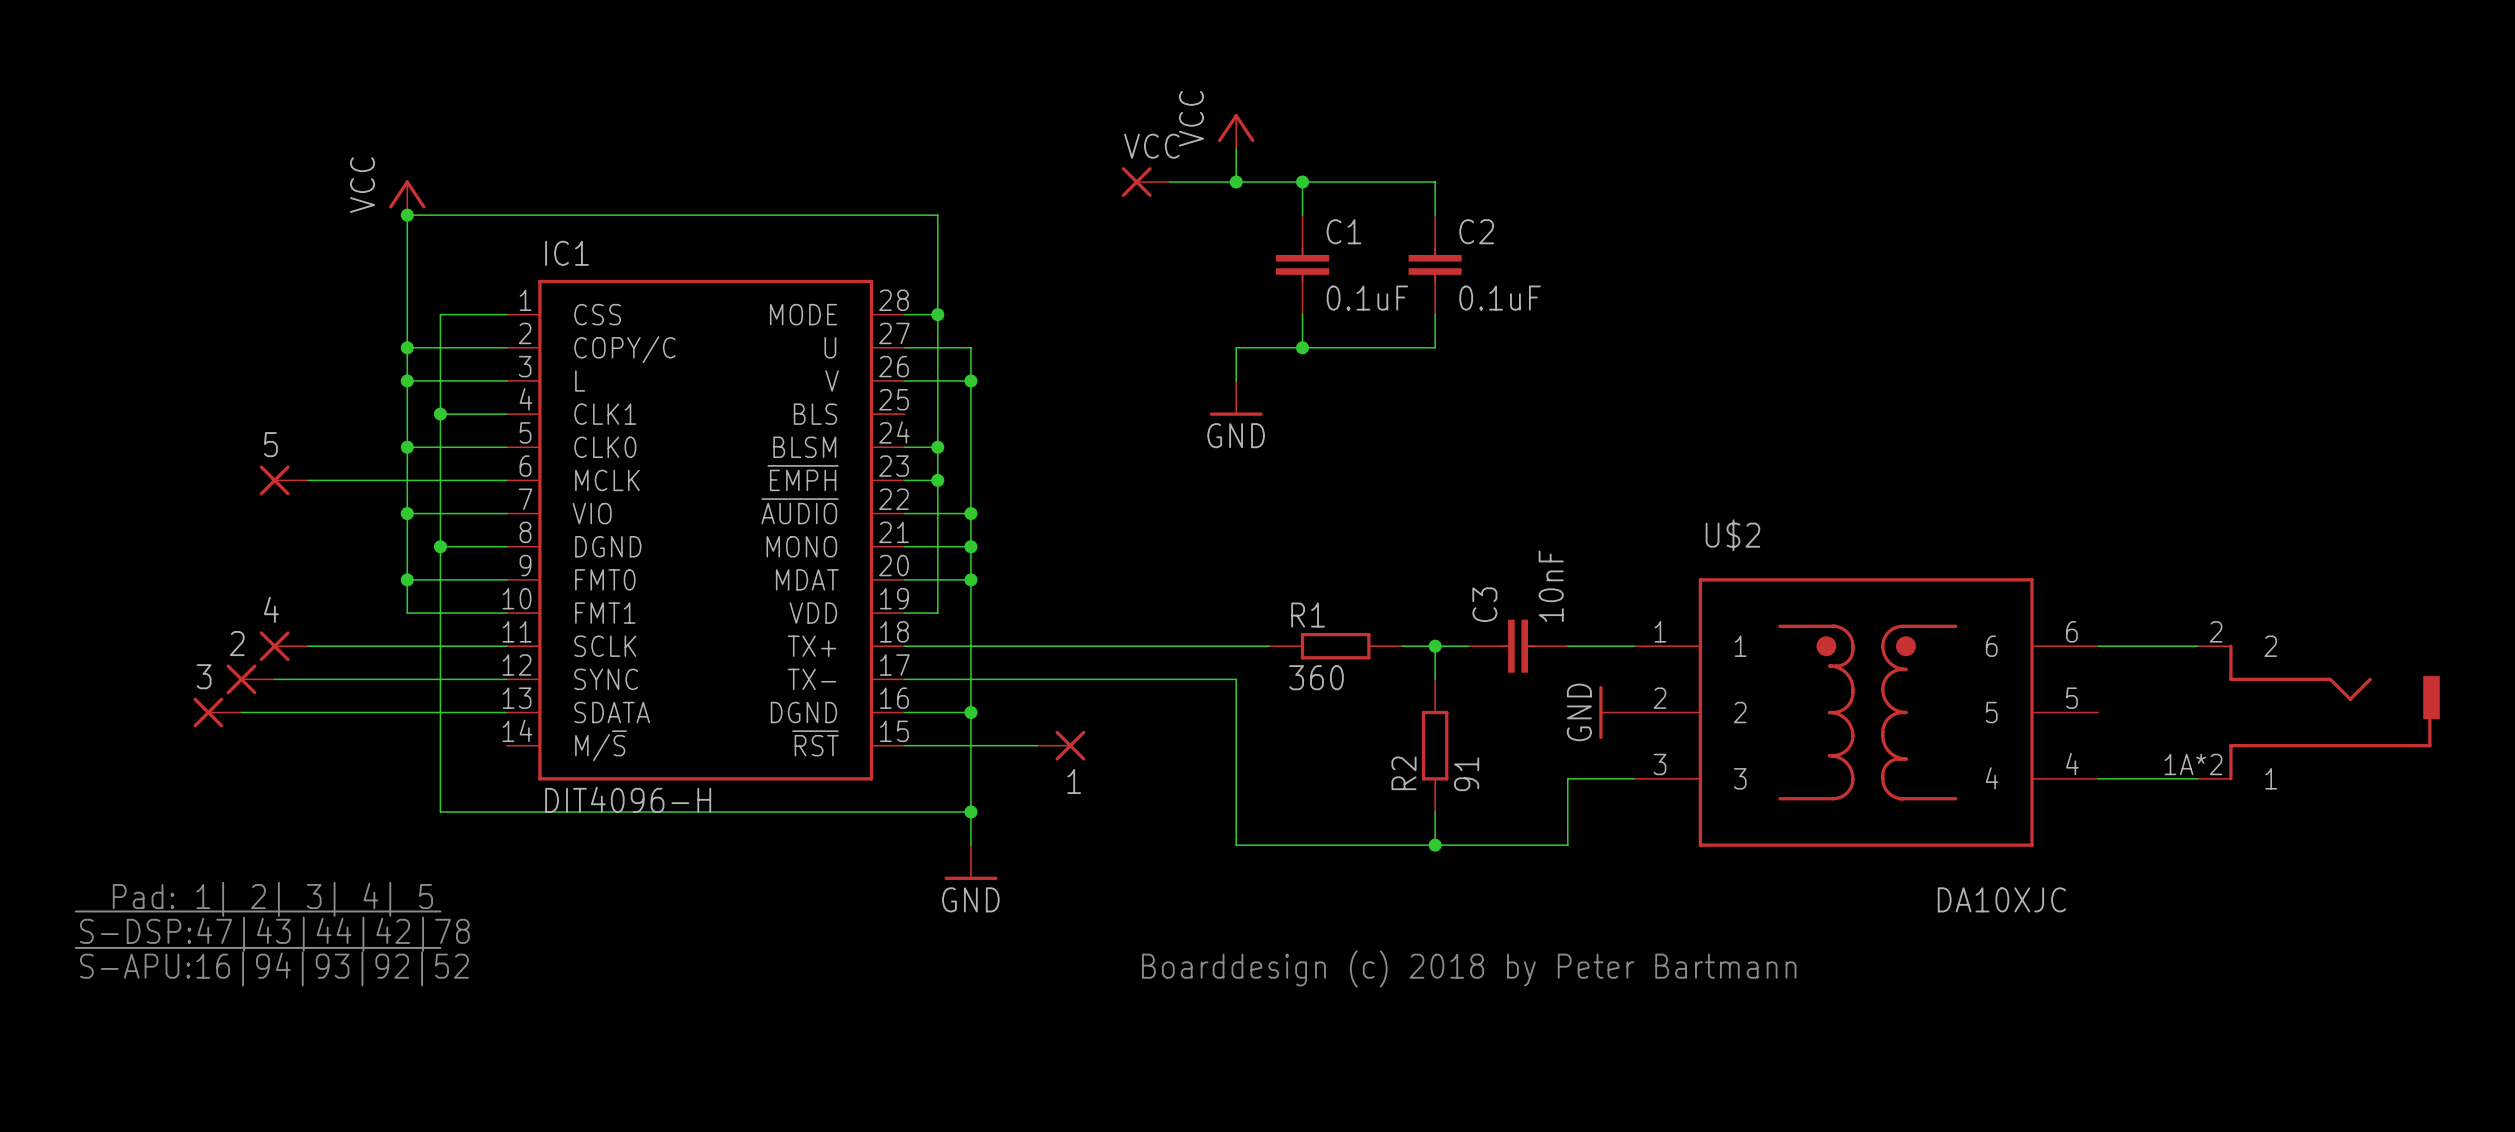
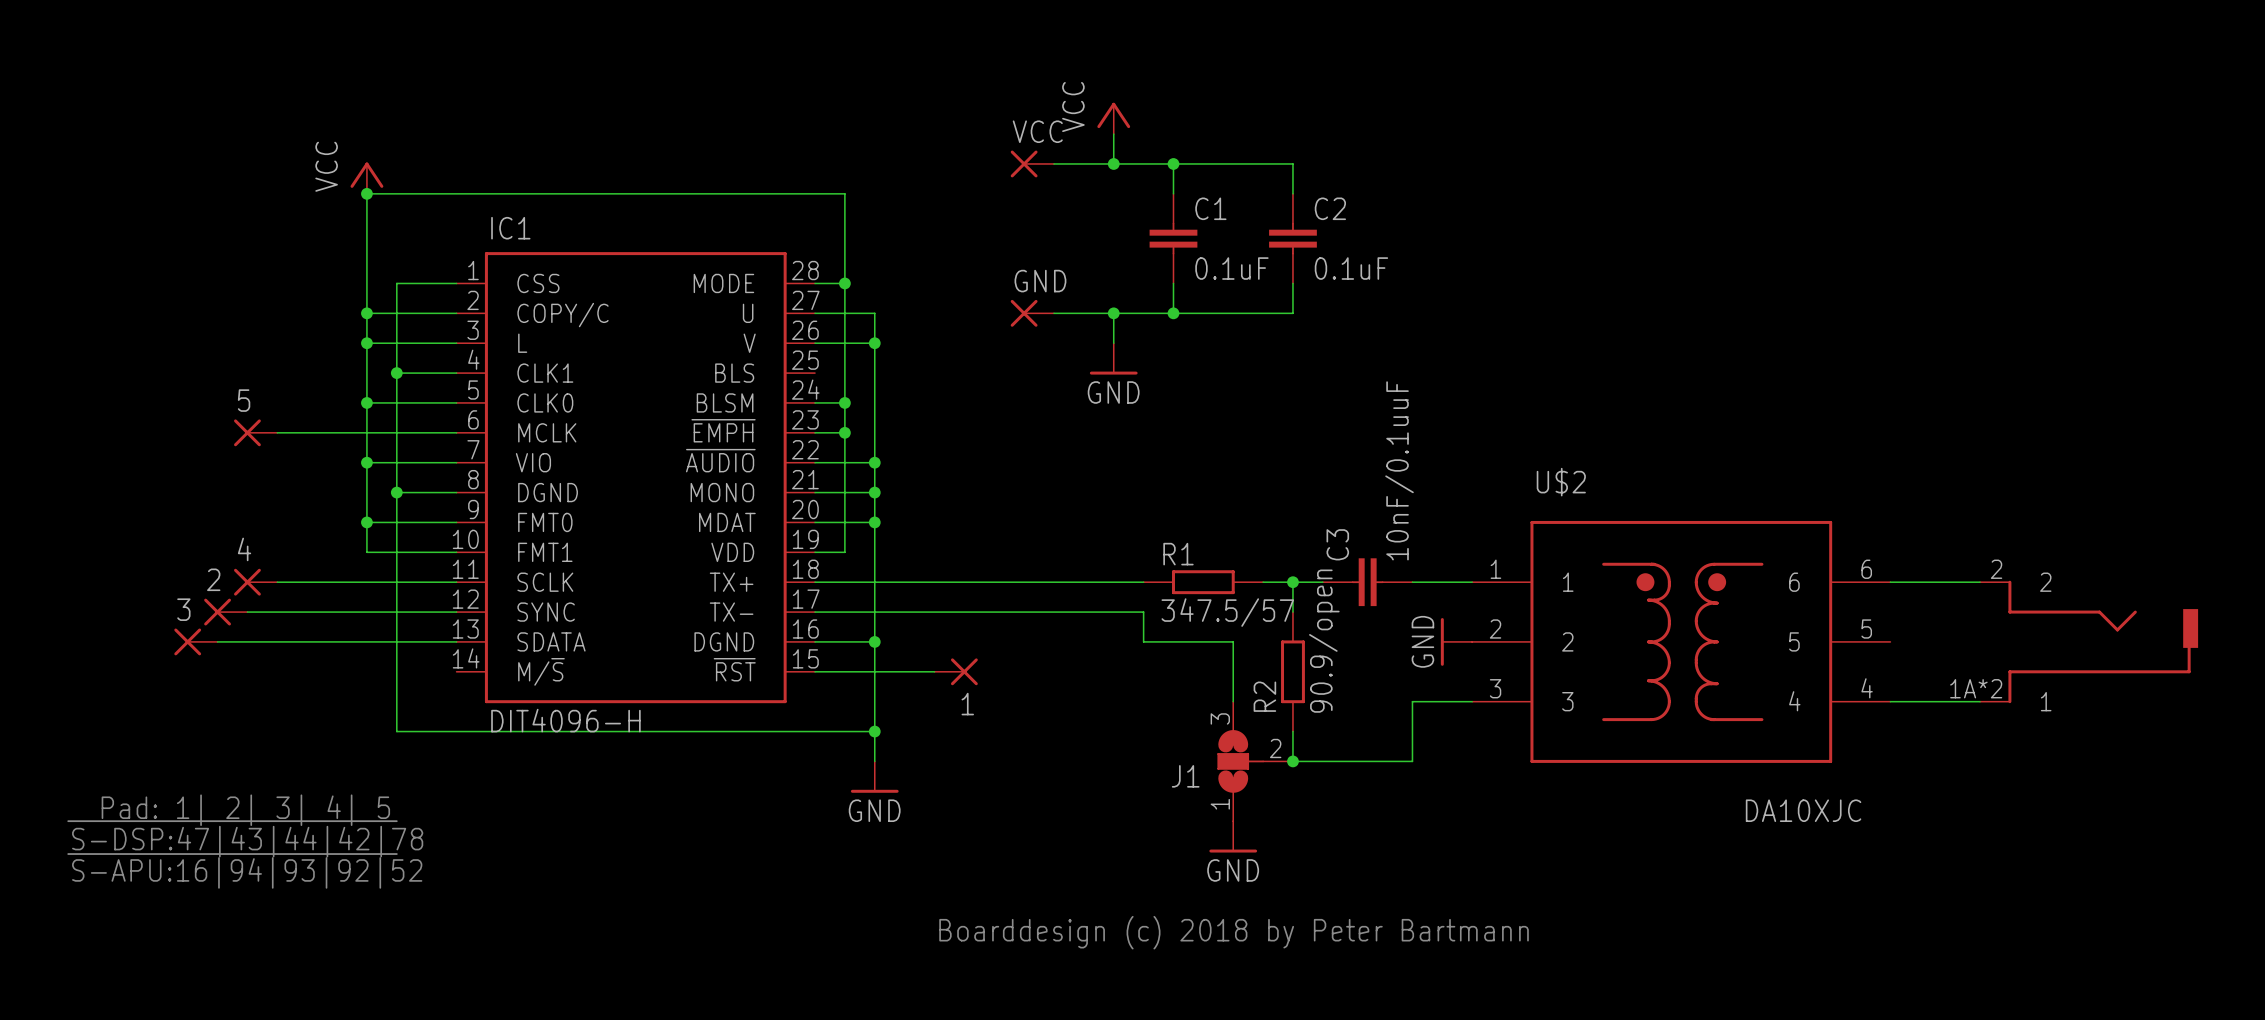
GND: none -> (1032, 313)
wire: none -> (1054, 313) (1113, 313)
junction: none -> (1113, 313)
C3 value: 10nF (1551, 586) -> 10nF/0.1uuF (1399, 470)
R1 value: 360 (1316, 677) -> 347.5/57 (1227, 612)
wire: (1236, 679) (1236, 845) (1435, 845) -> (1113, 612) (1143, 612) (1143, 641) (1233, 641) (1233, 701)
R2 value: 91 (1466, 774) -> 90.9/open (1324, 641)
J1: none -> (1255, 761)
power symbol: none -> GND (1233, 836)
text position: Boarddesign (c) 2018 by Peter Bartmann (1469, 968) -> Boarddesign (c) 2018 by Peter Bartmann (1234, 932)

